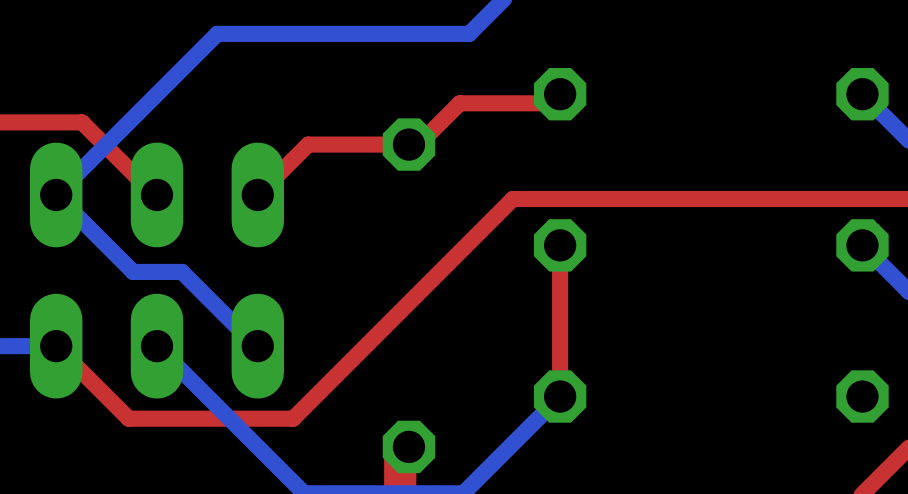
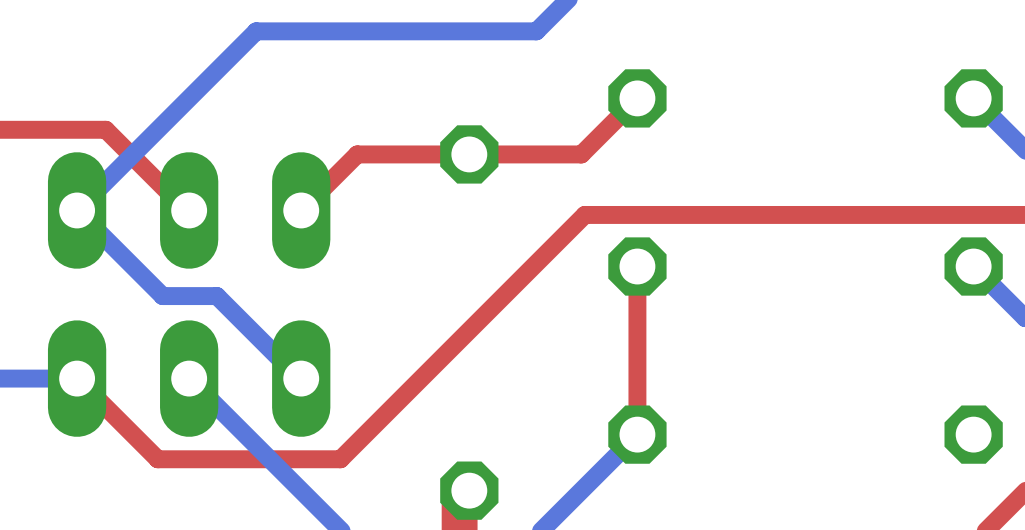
top track: (560, 94) (558, 103) (459, 103) (410, 152) (408, 144) -> (637, 98) (581, 154) (469, 154)

